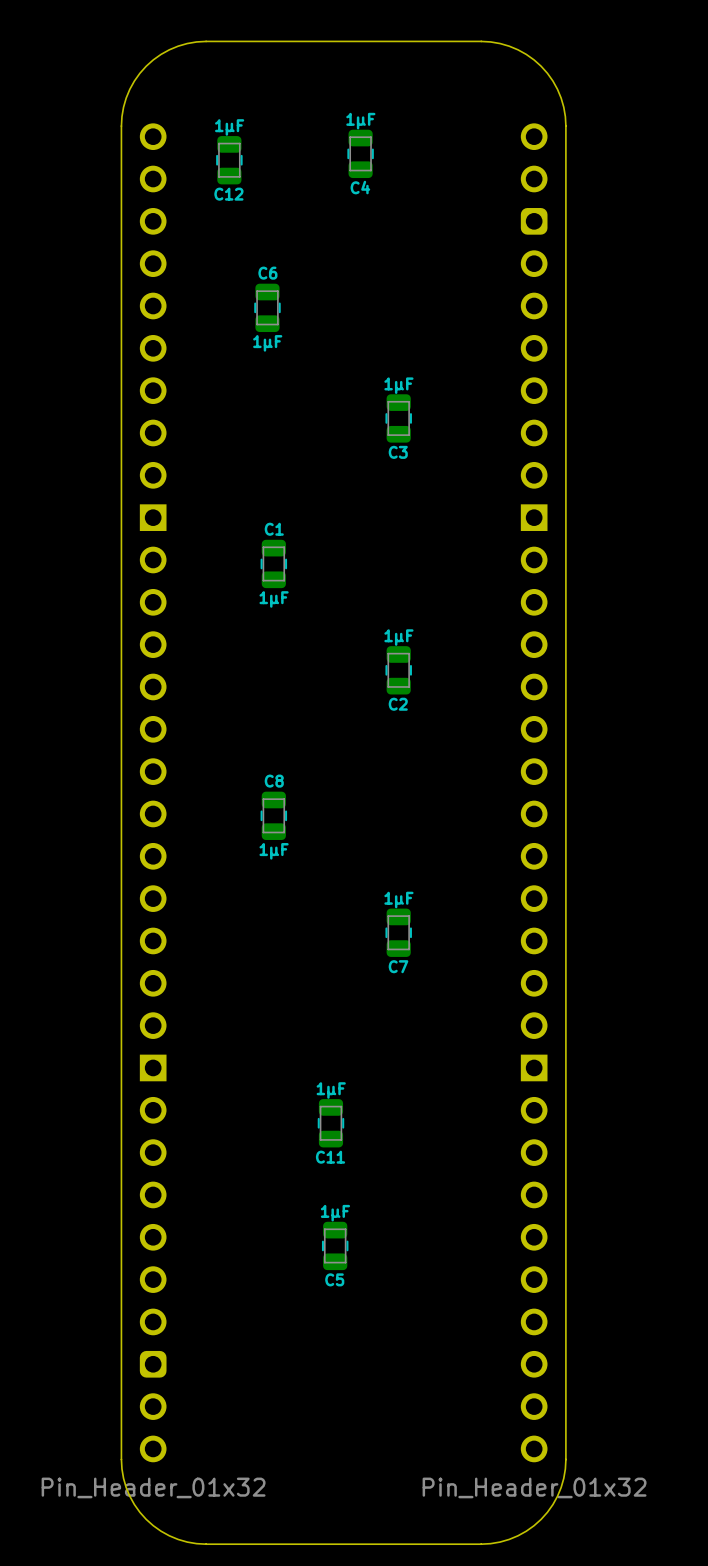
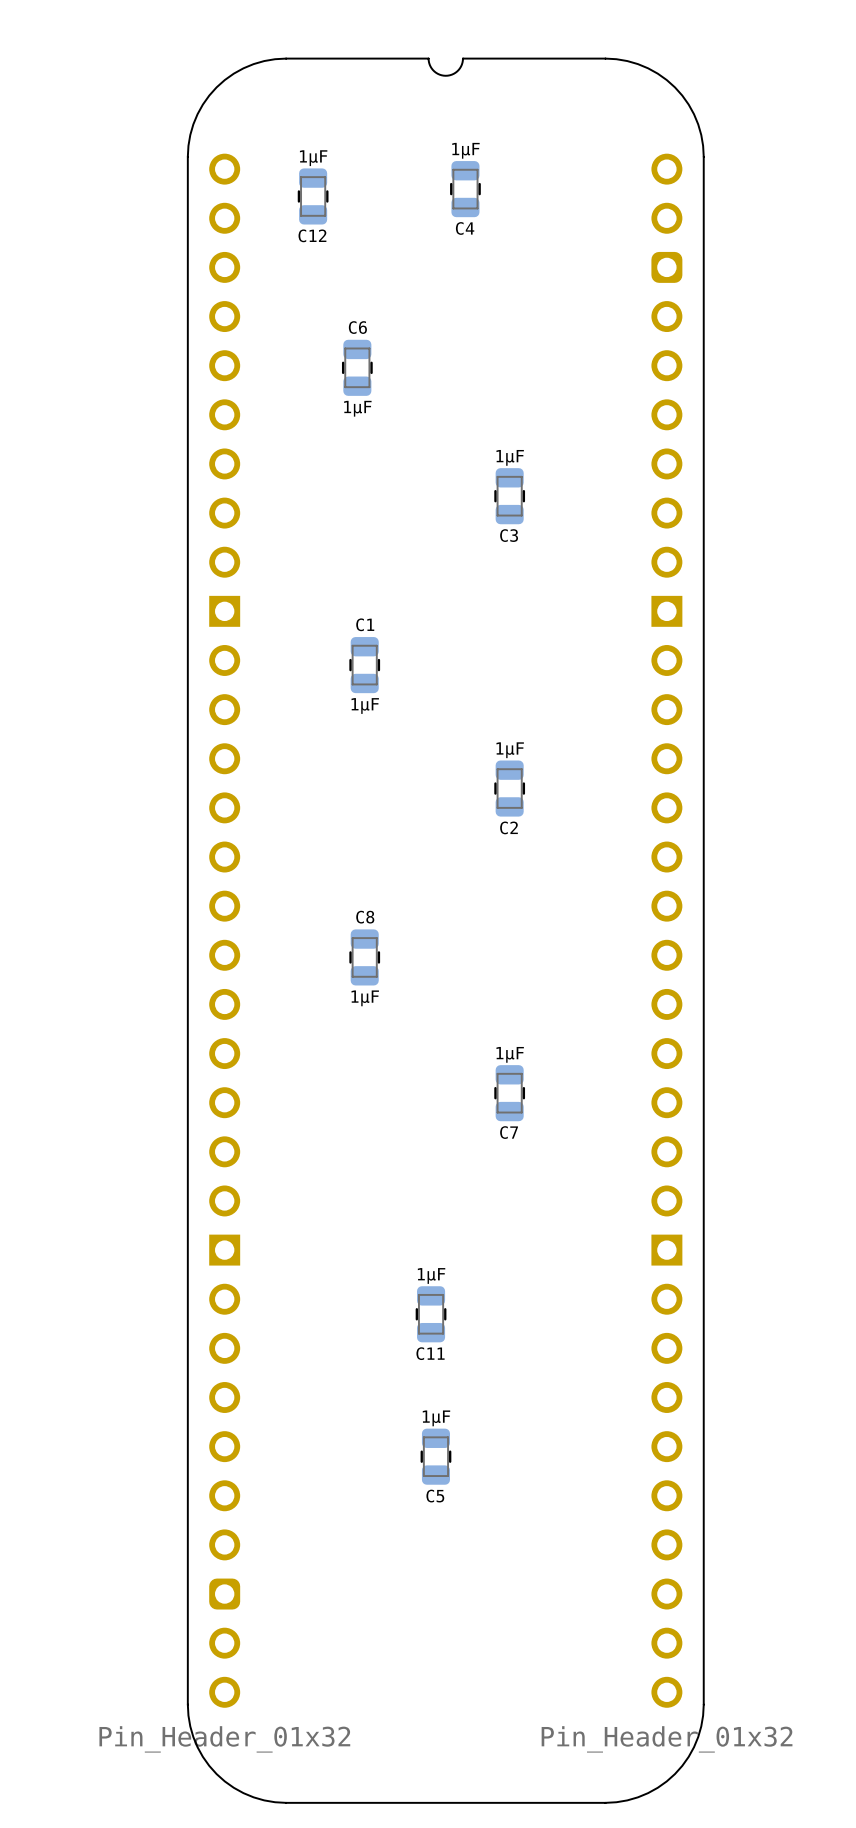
part footprint: [120, 40, 567, 1546] -> [186, 57, 705, 1804]

